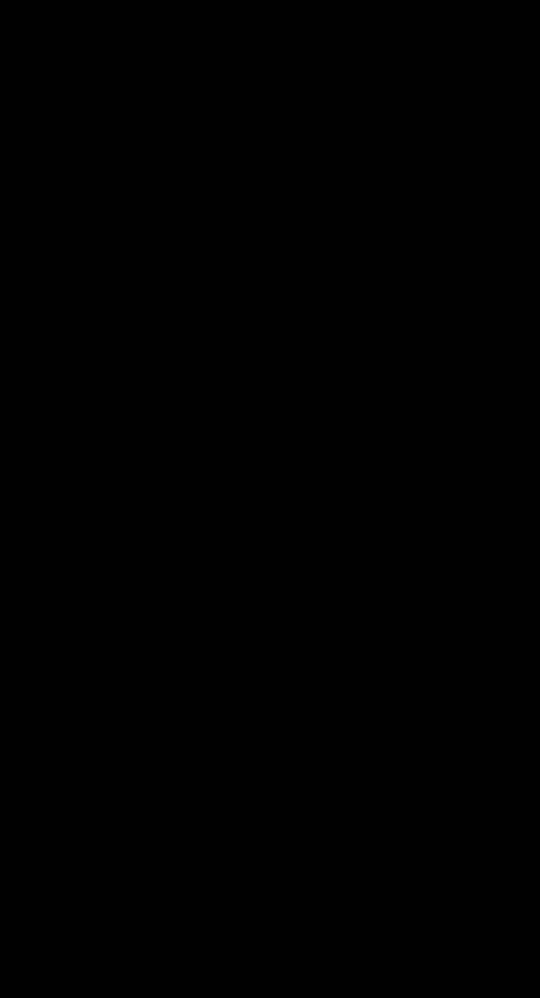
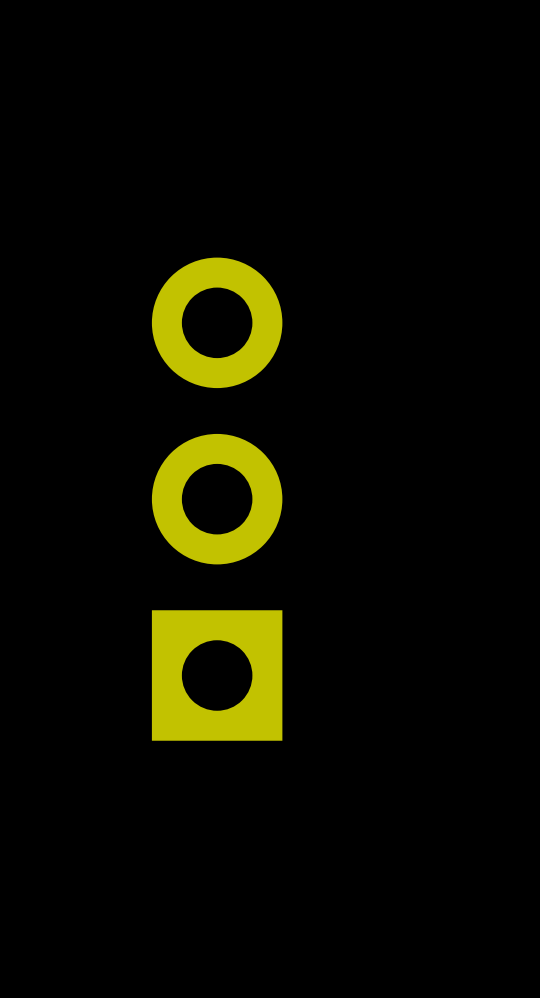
part: none -> (217, 499)

